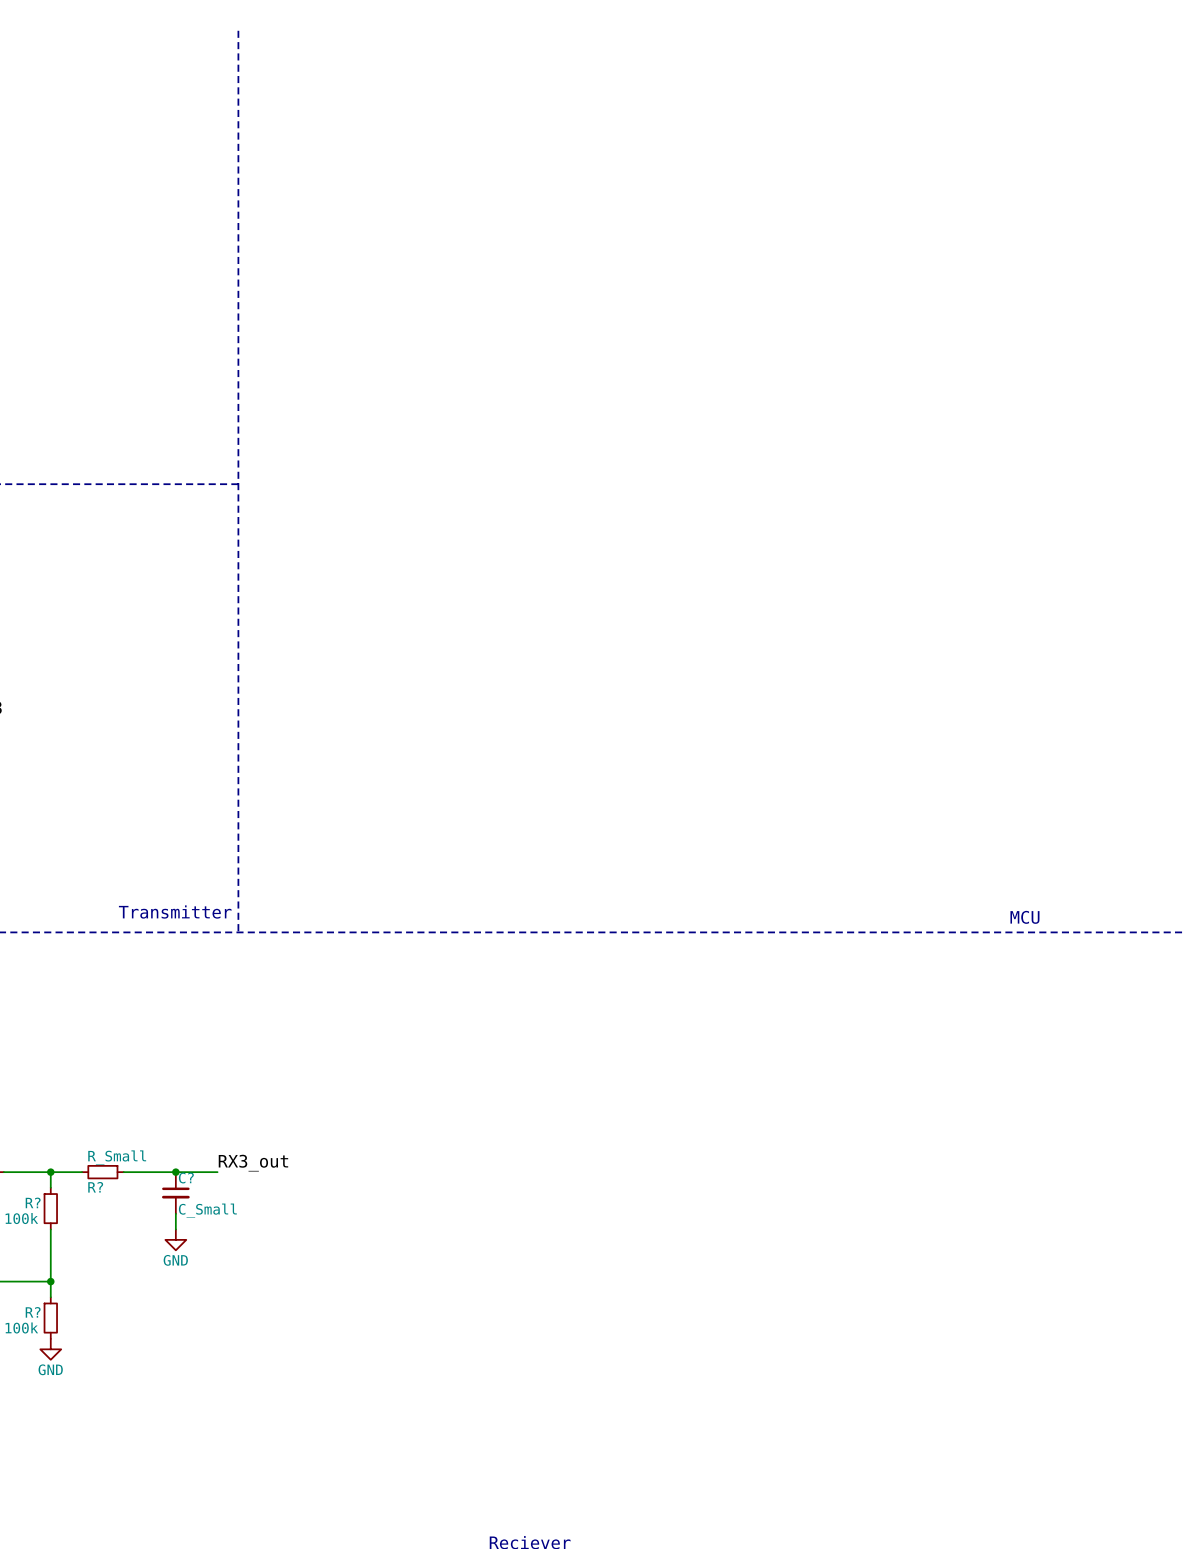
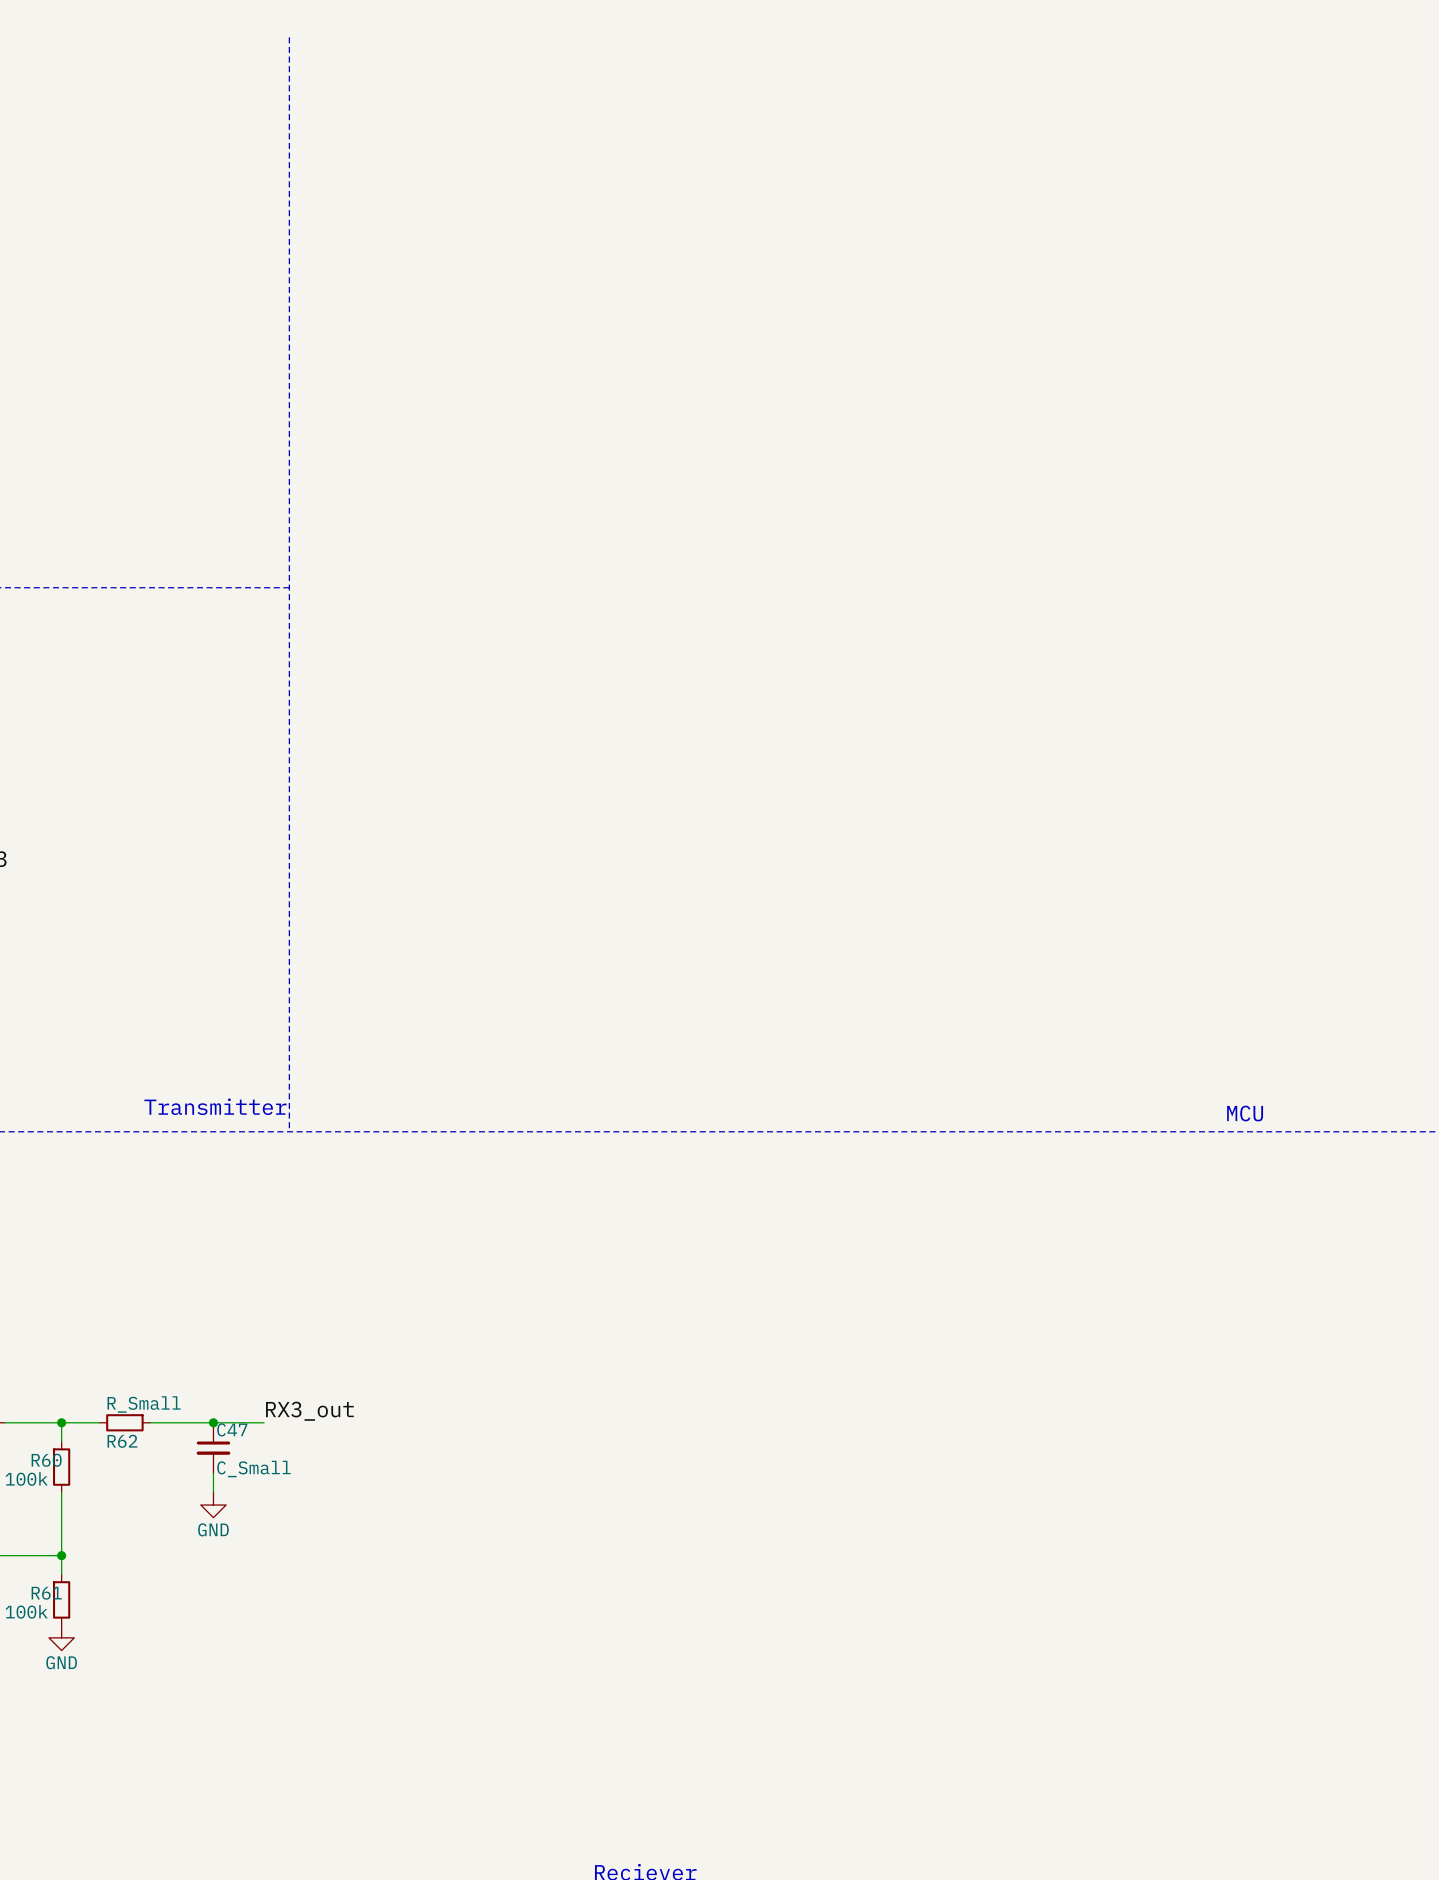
C? name: C? (186, 1178) -> C47 (232, 1429)
R? name: R? (95, 1187) -> R62 (122, 1441)
R? name: R? (33, 1202) -> R60 (46, 1460)
R? name: R? (33, 1312) -> R61 (46, 1593)

